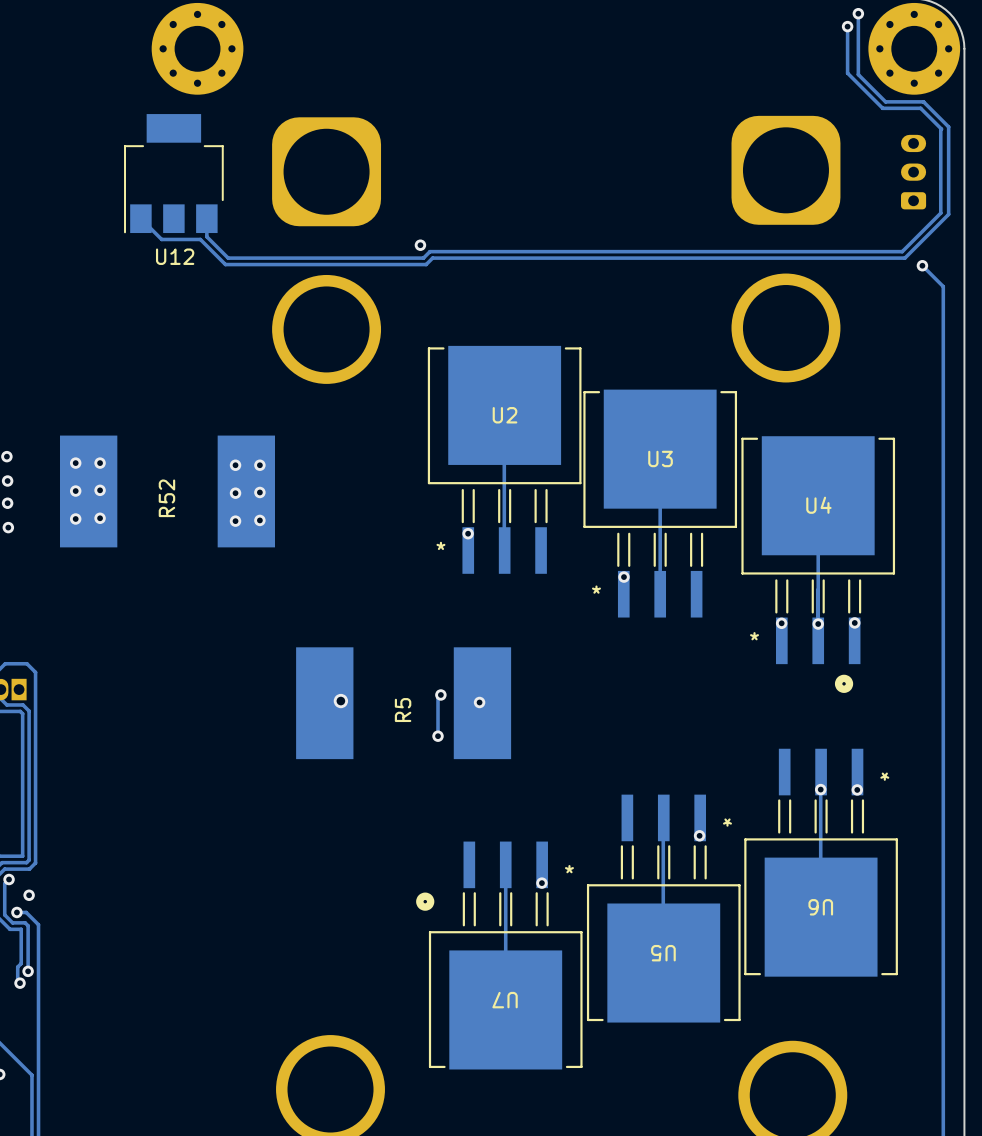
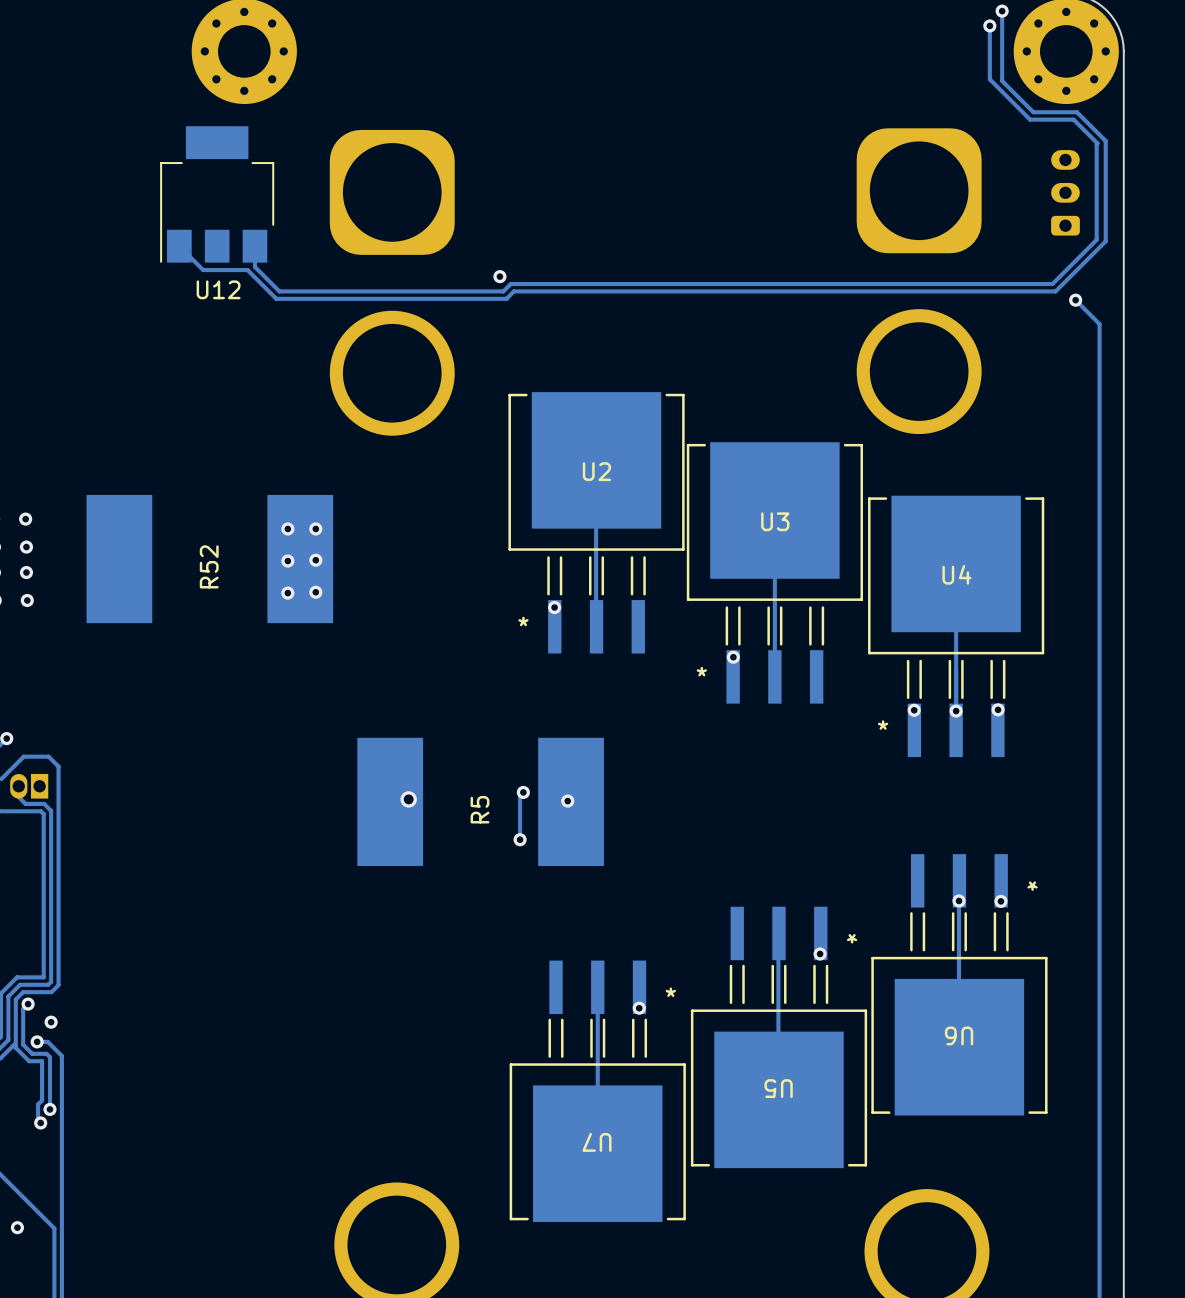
via: (75, 463) -> none
via: (100, 463) -> none
via: (100, 490) -> none
via: (75, 491) -> none
via: (75, 518) -> none
via: (100, 518) -> none
part: (844, 683) -> none
part: (425, 901) -> none

